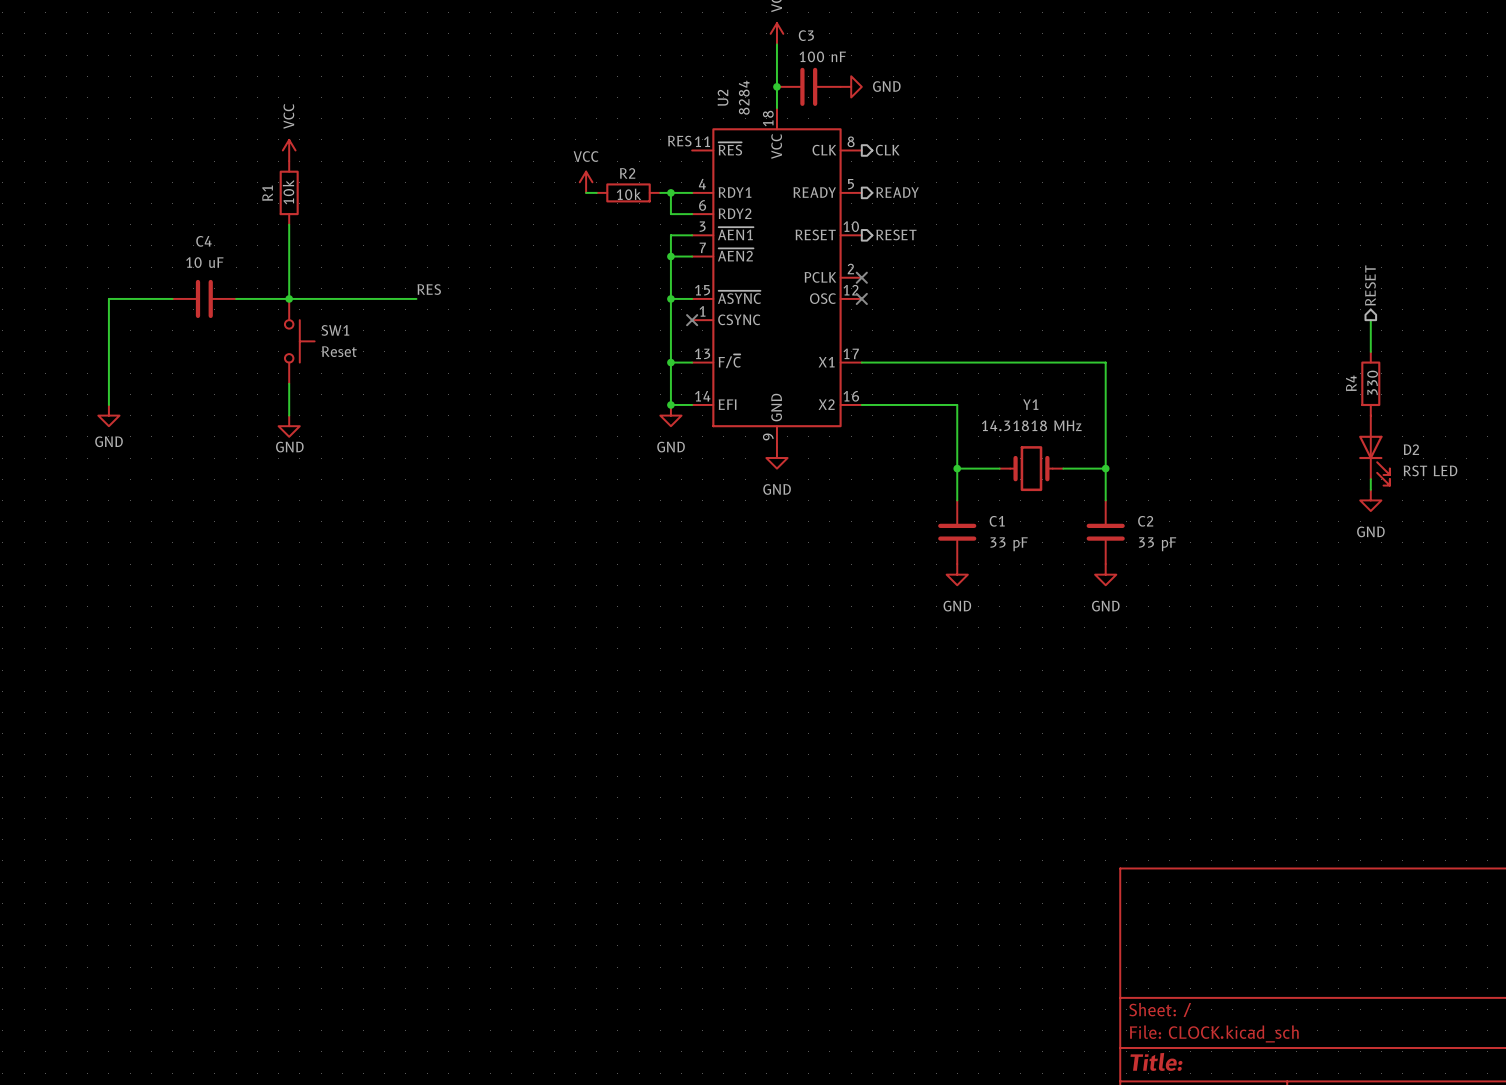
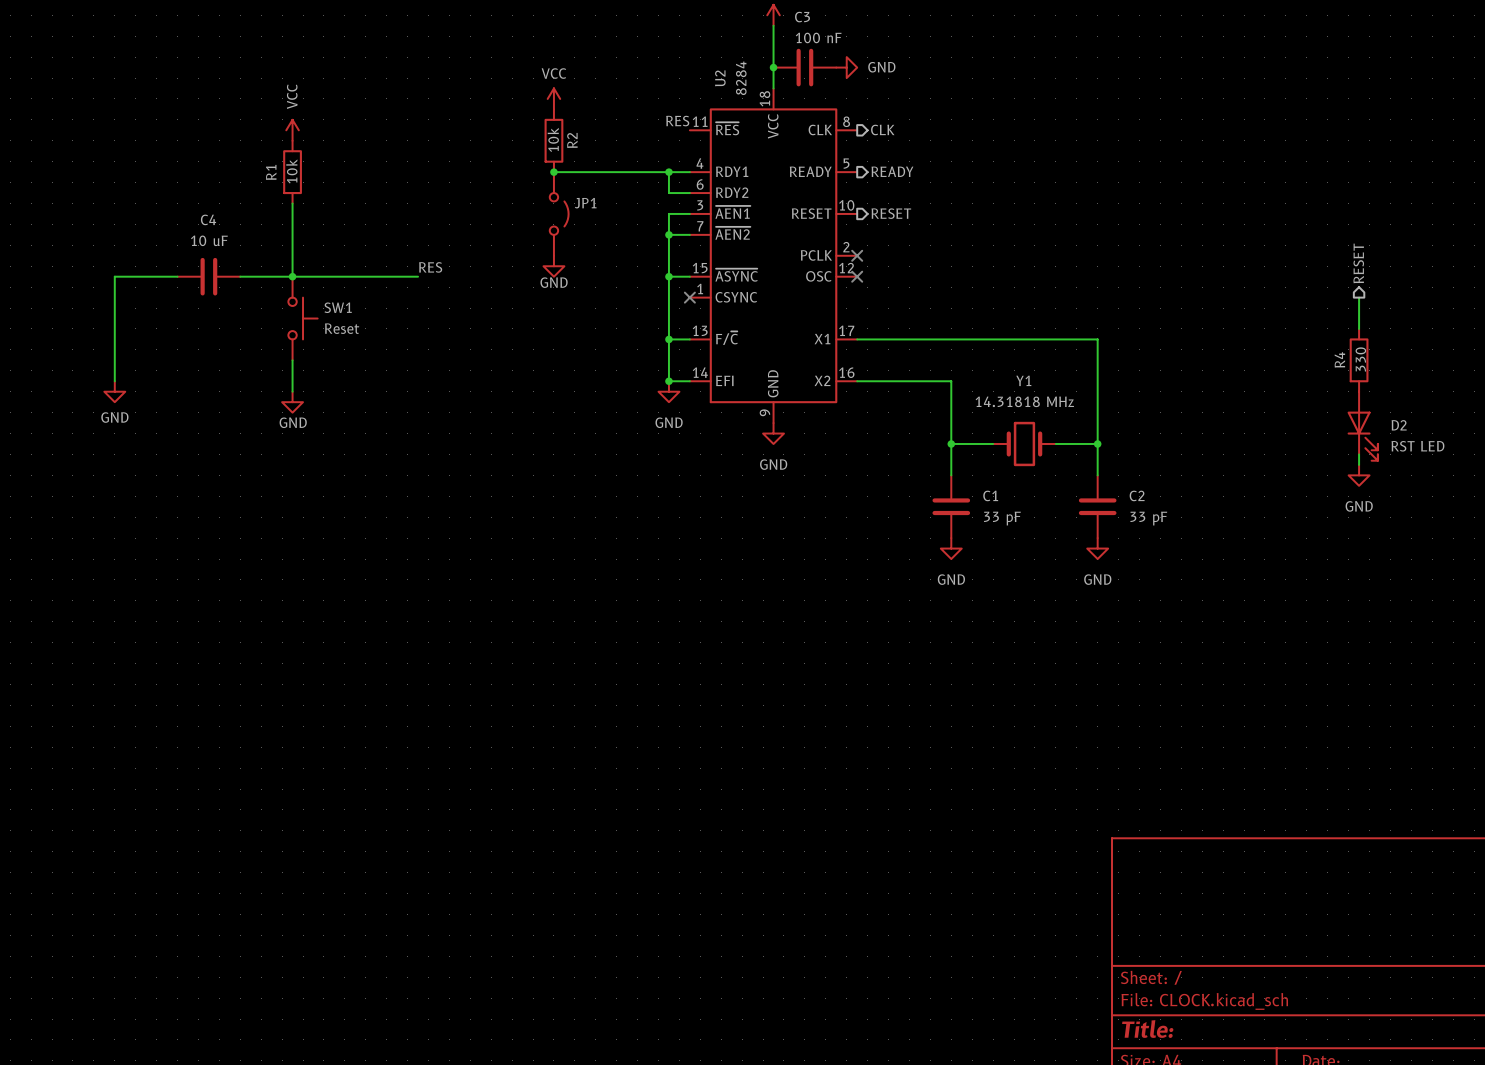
power symbol position: VCC (586, 182) -> VCC (553, 98)
wire: none -> (553, 172) (585, 172)
junction: none -> (553, 172)
wire: none -> (595, 172) (658, 172)
R2 rotation: 0° (628, 192) -> 90° clockwise (553, 140)
R2 position: (628, 192) -> (553, 140)
JP1: none -> (559, 213)
power symbol: none -> GND (553, 266)

